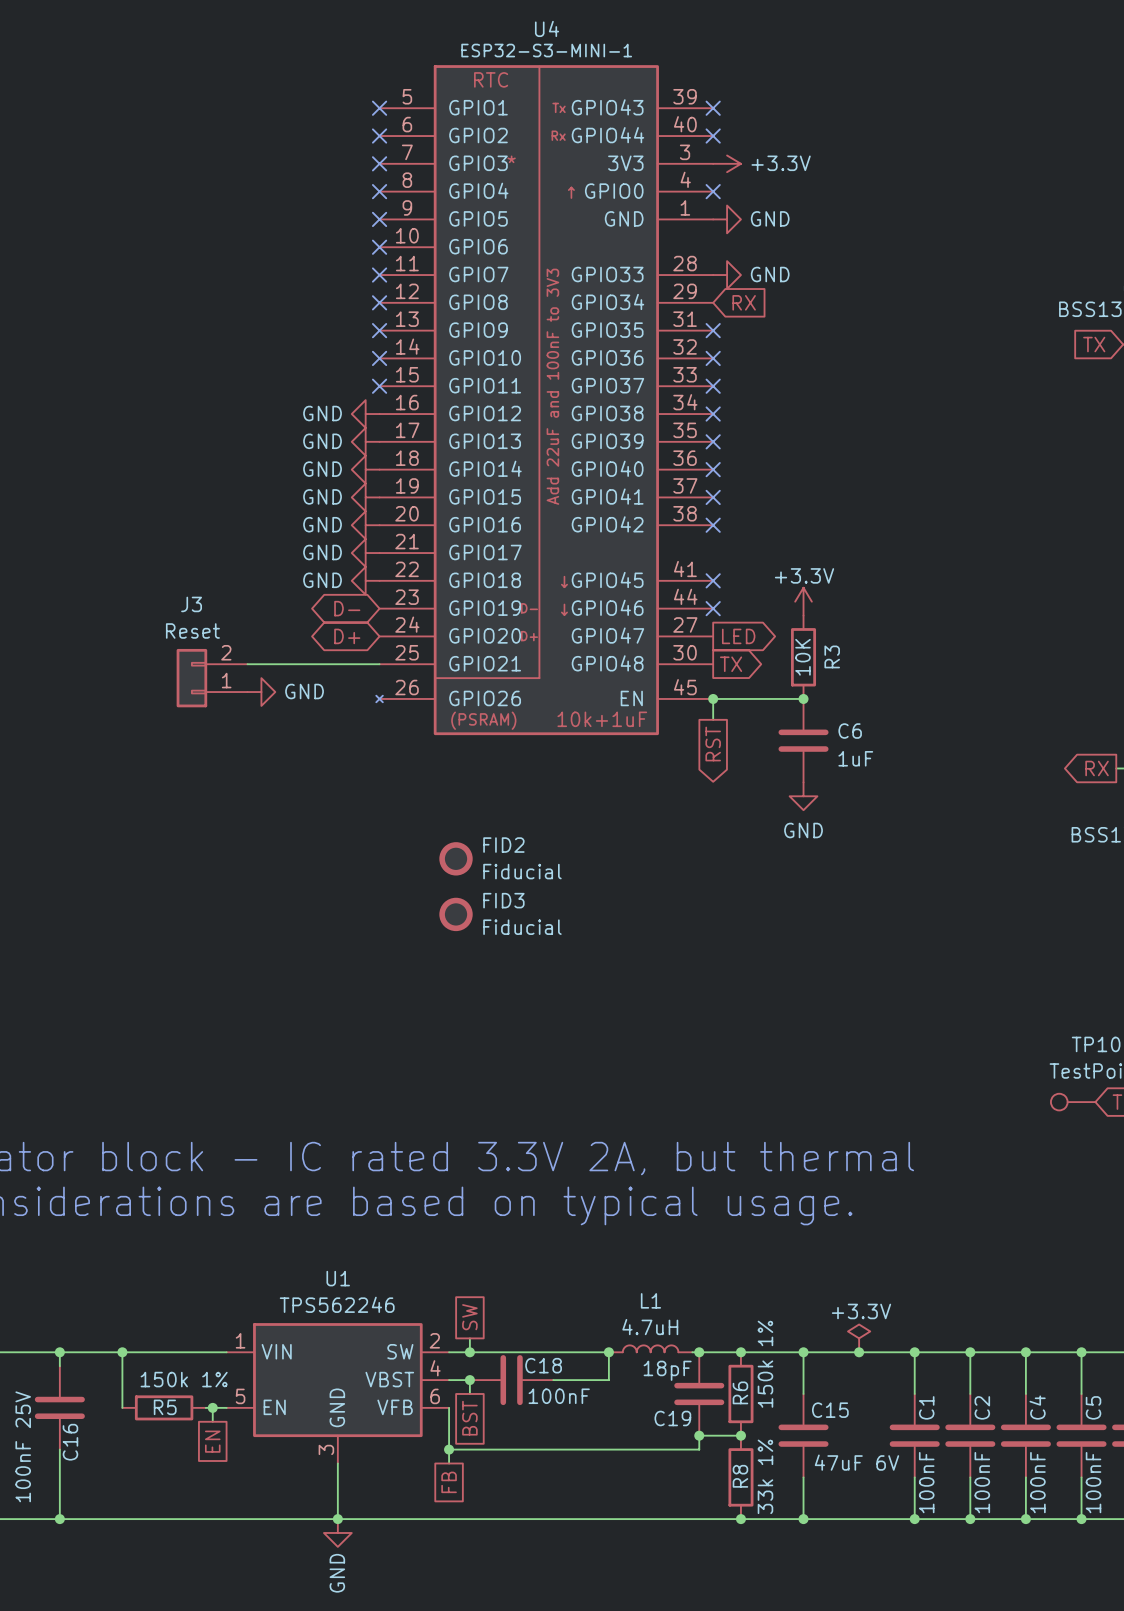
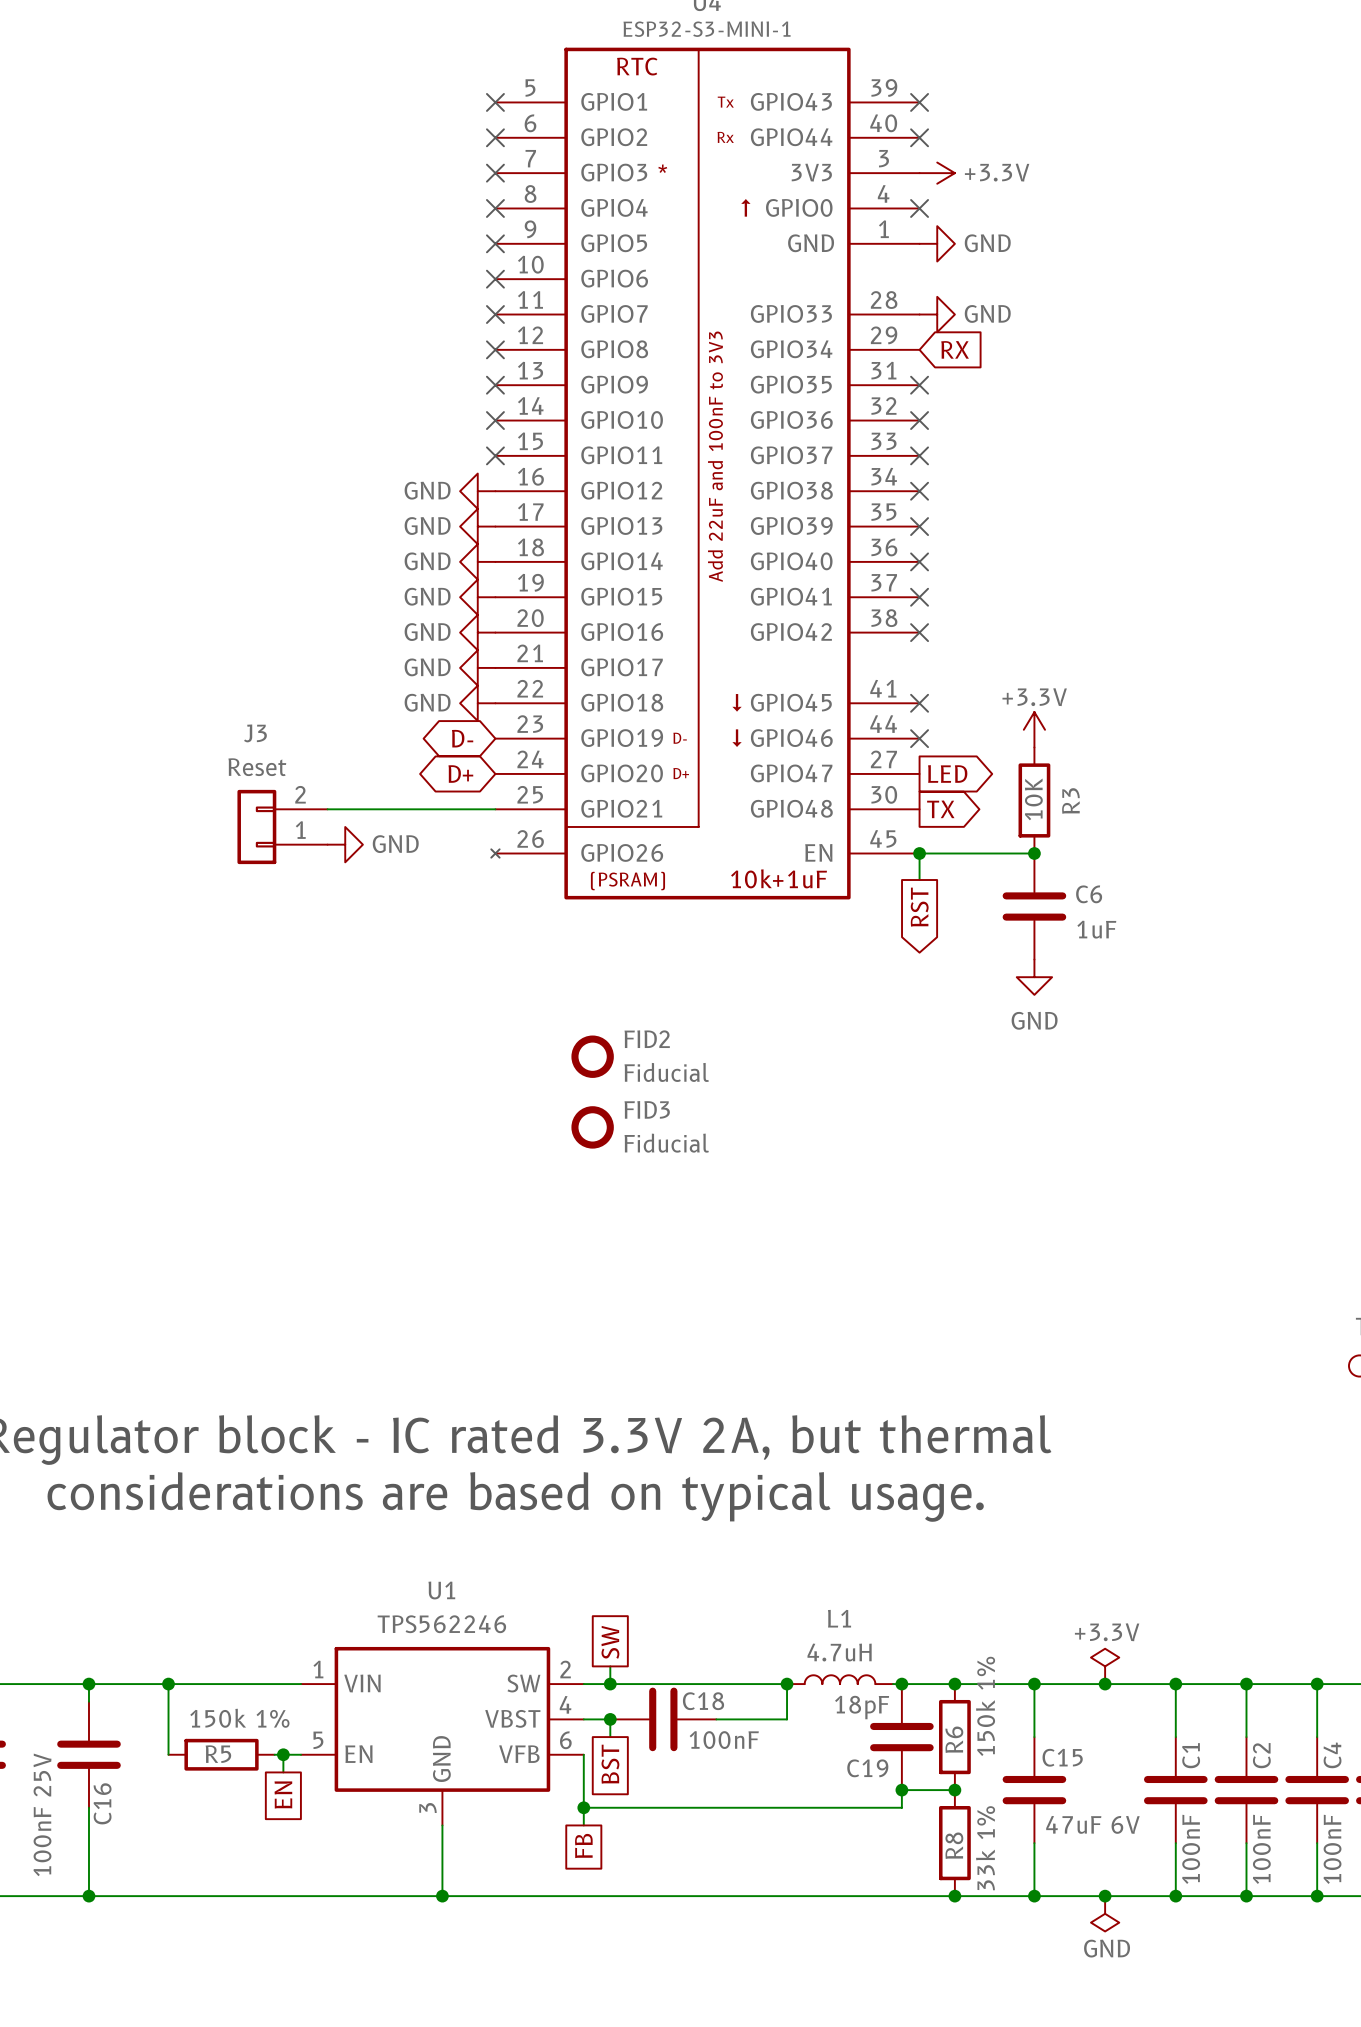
junction: none -> (1105, 1896)
power symbol: GND (337, 1532) -> none
power symbol: none -> GND (1105, 1913)

